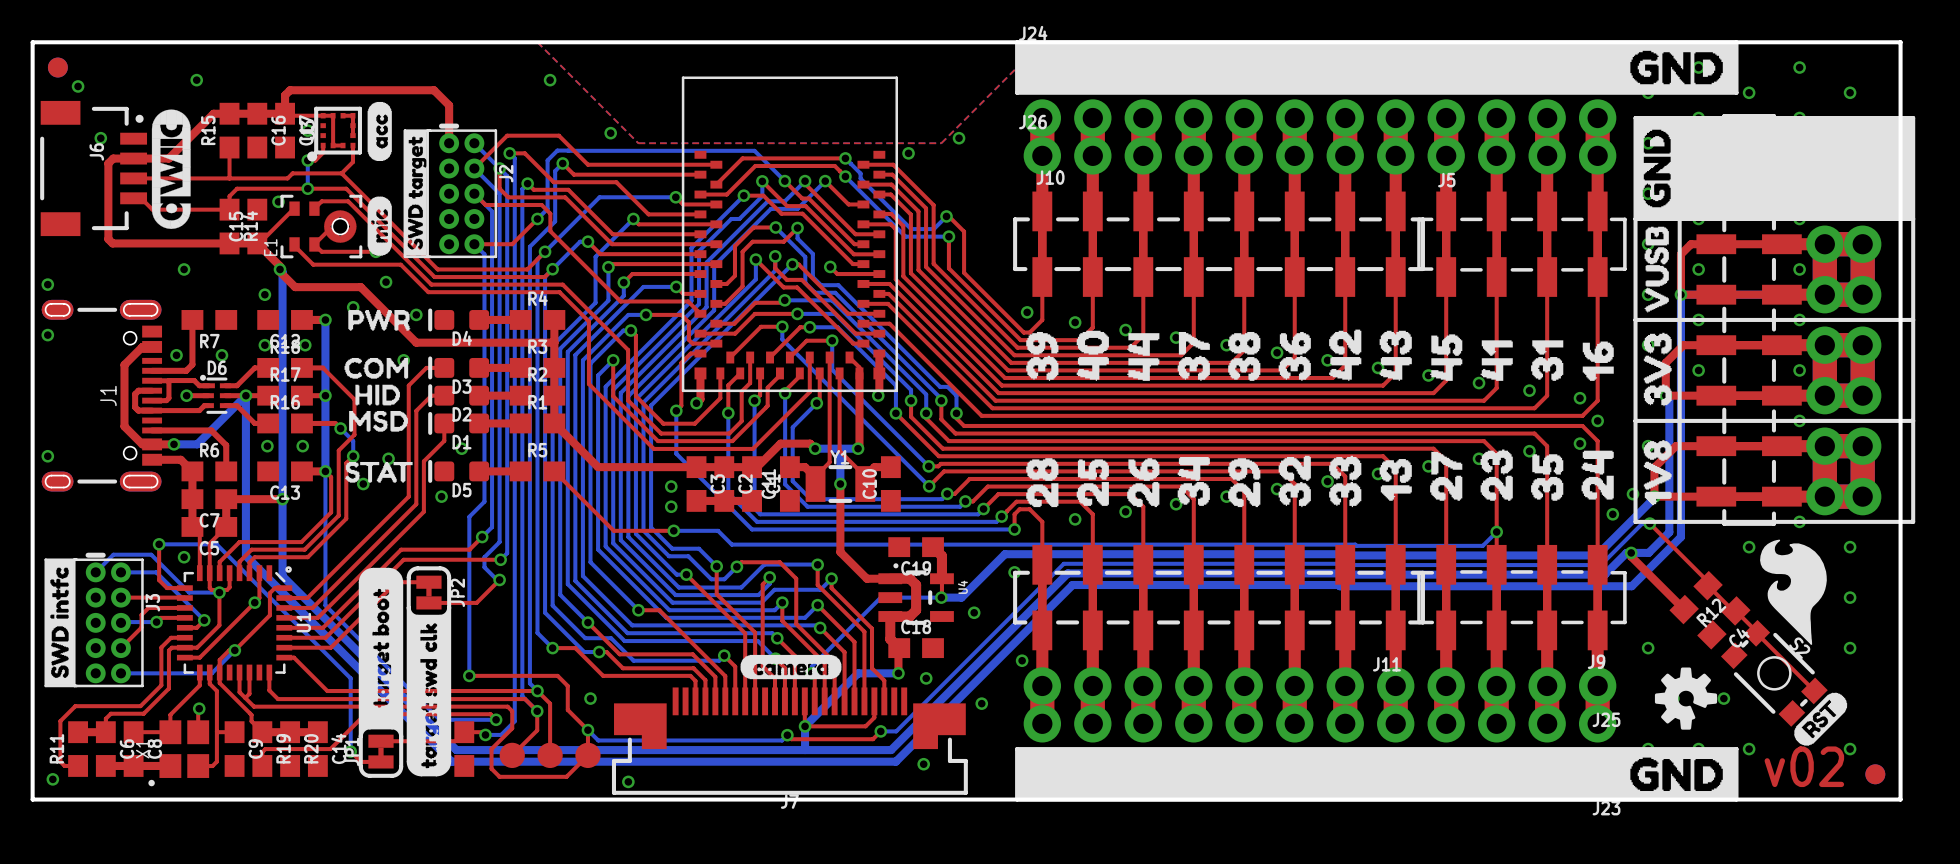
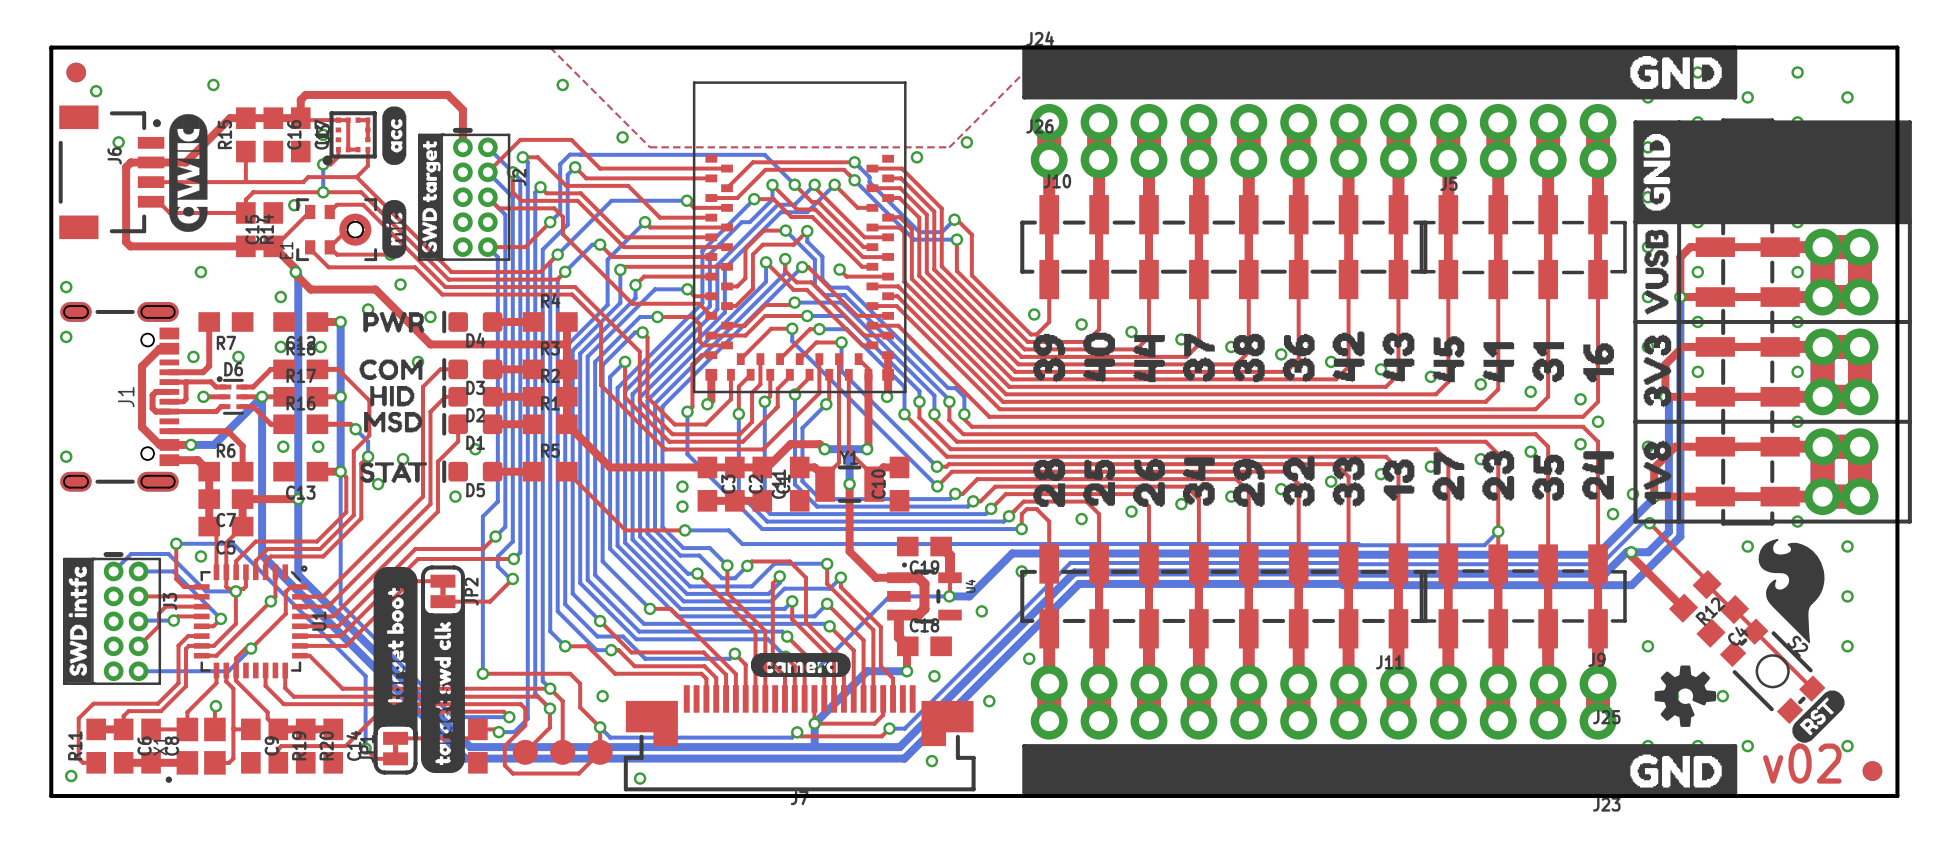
top track: (239, 672) (239, 692) (253, 706) (267, 706) -> (265, 685) (283, 704)
top track: (249, 688) (249, 693) (245, 697) -> none

